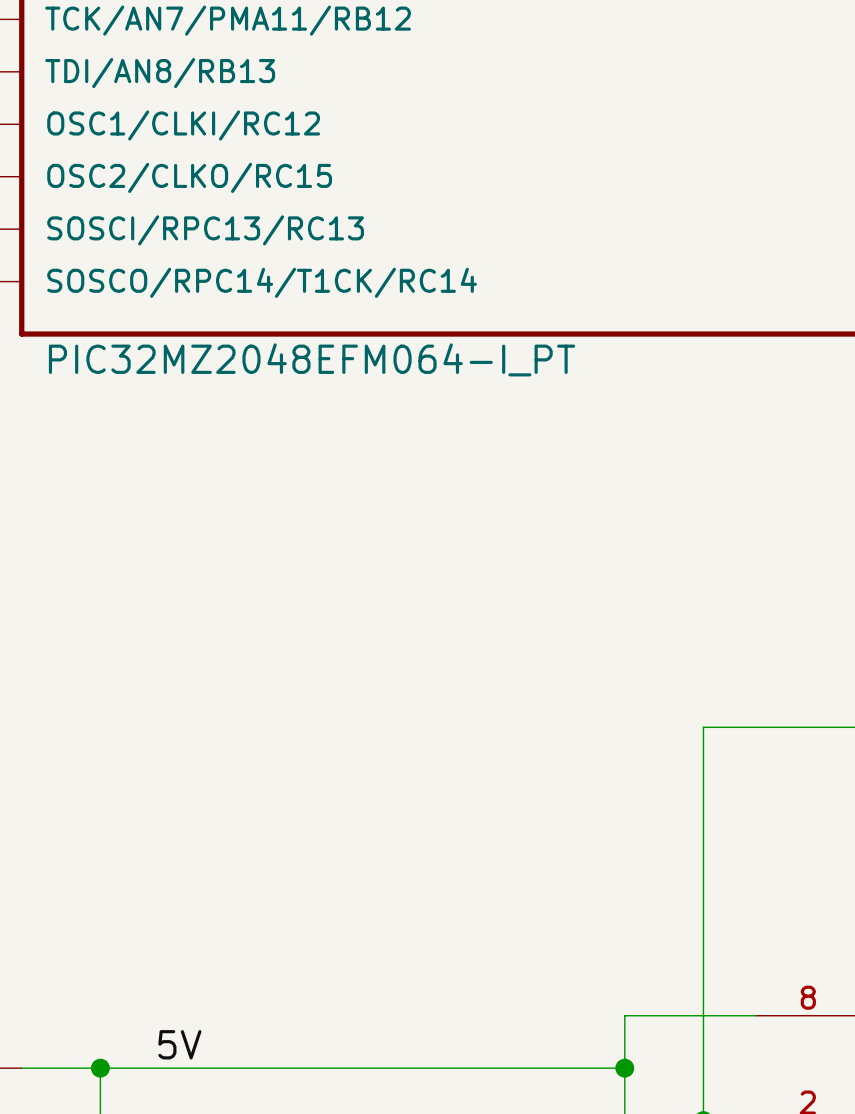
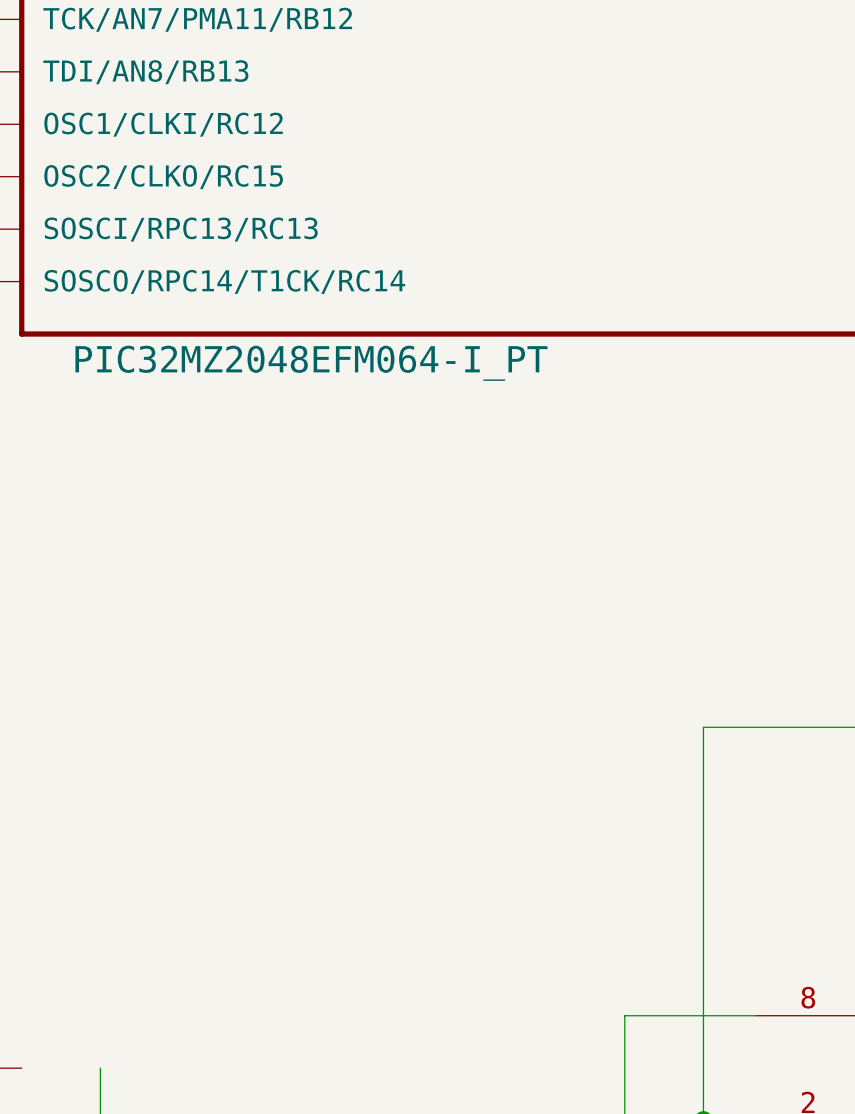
label: 5V (179, 1044) -> none
wire: (21, 1068) (624, 1068) -> none
junction: (100, 1068) -> none
junction: (624, 1068) -> none

